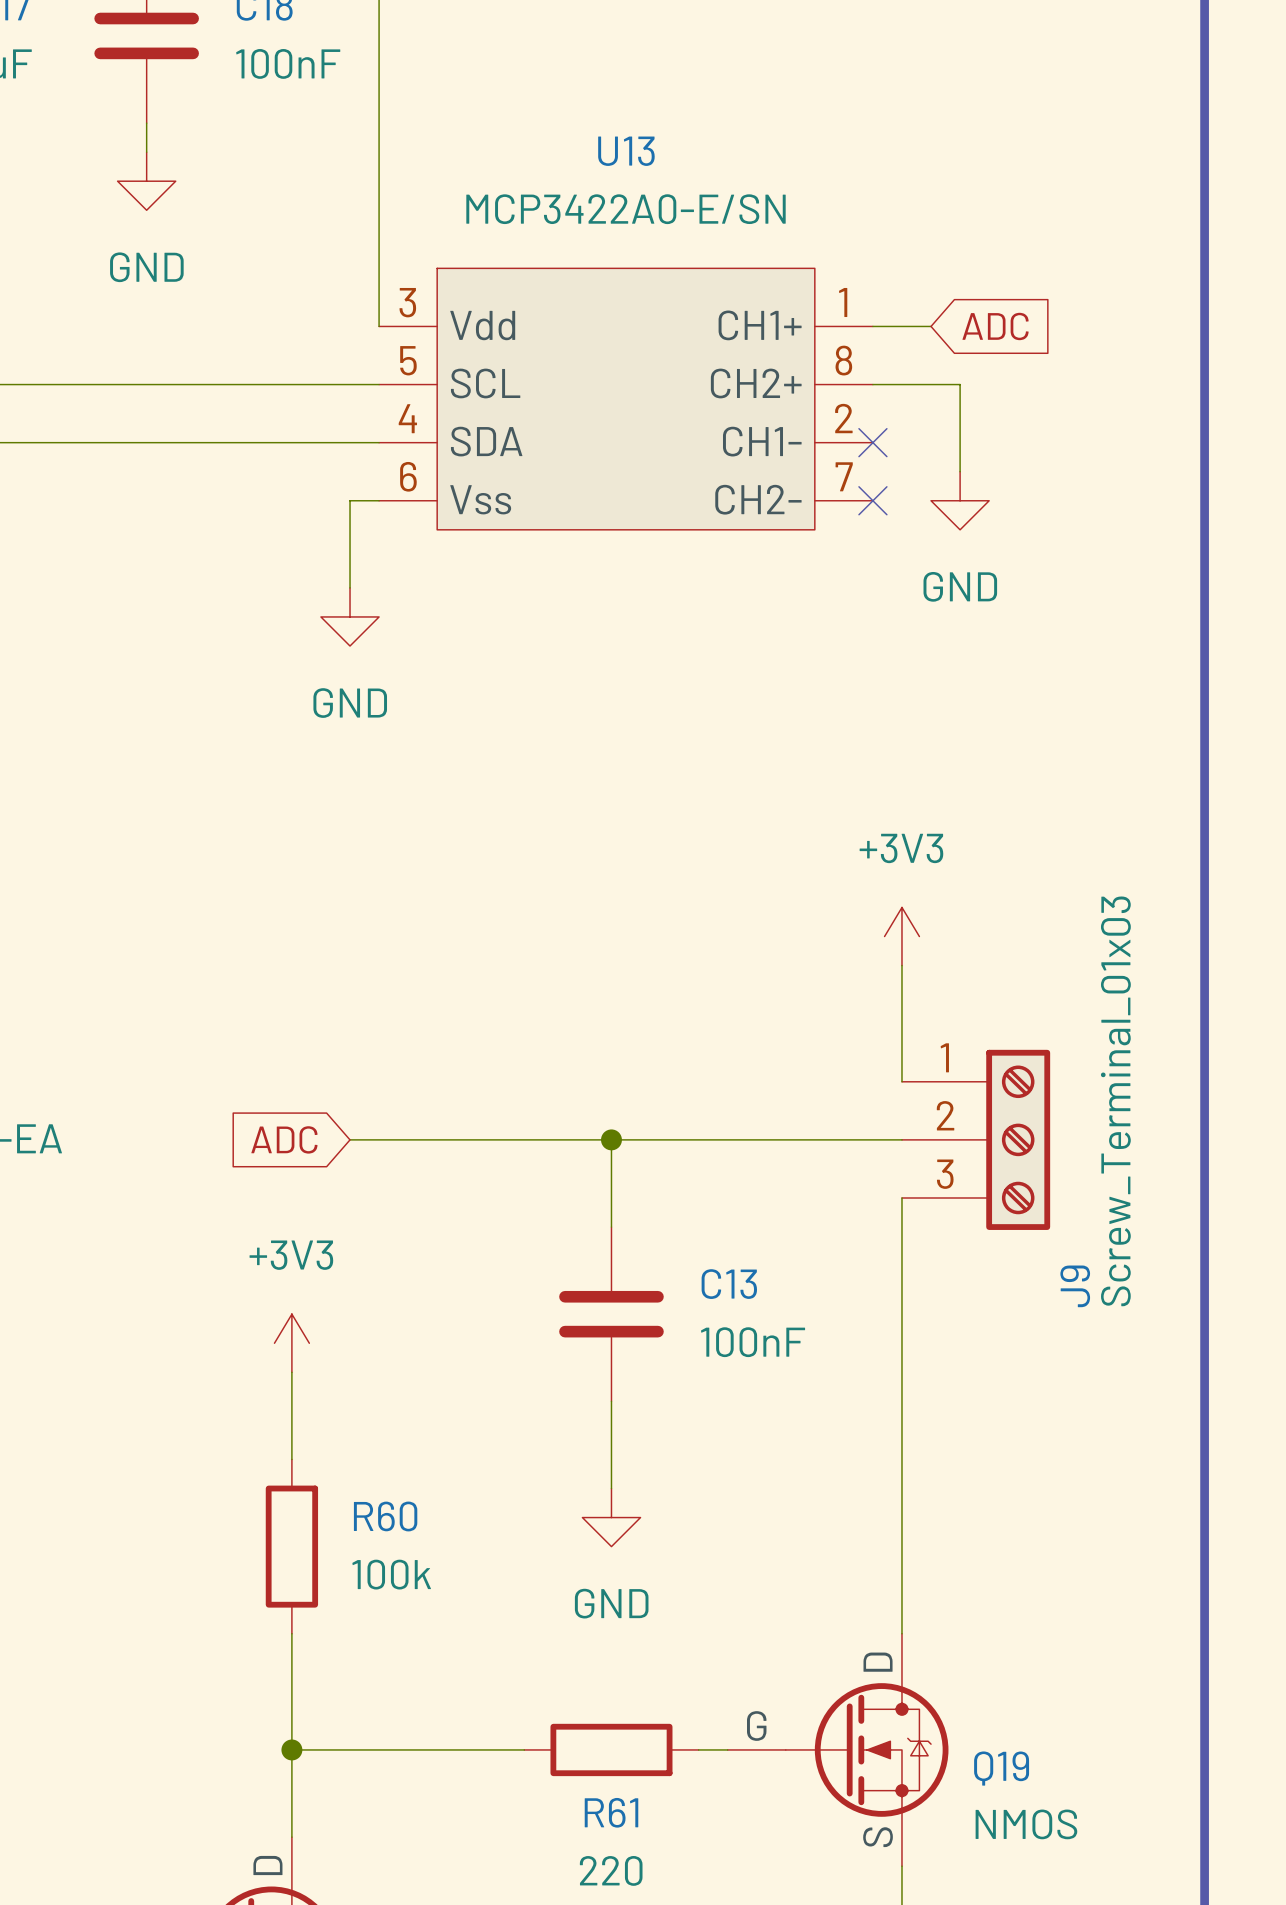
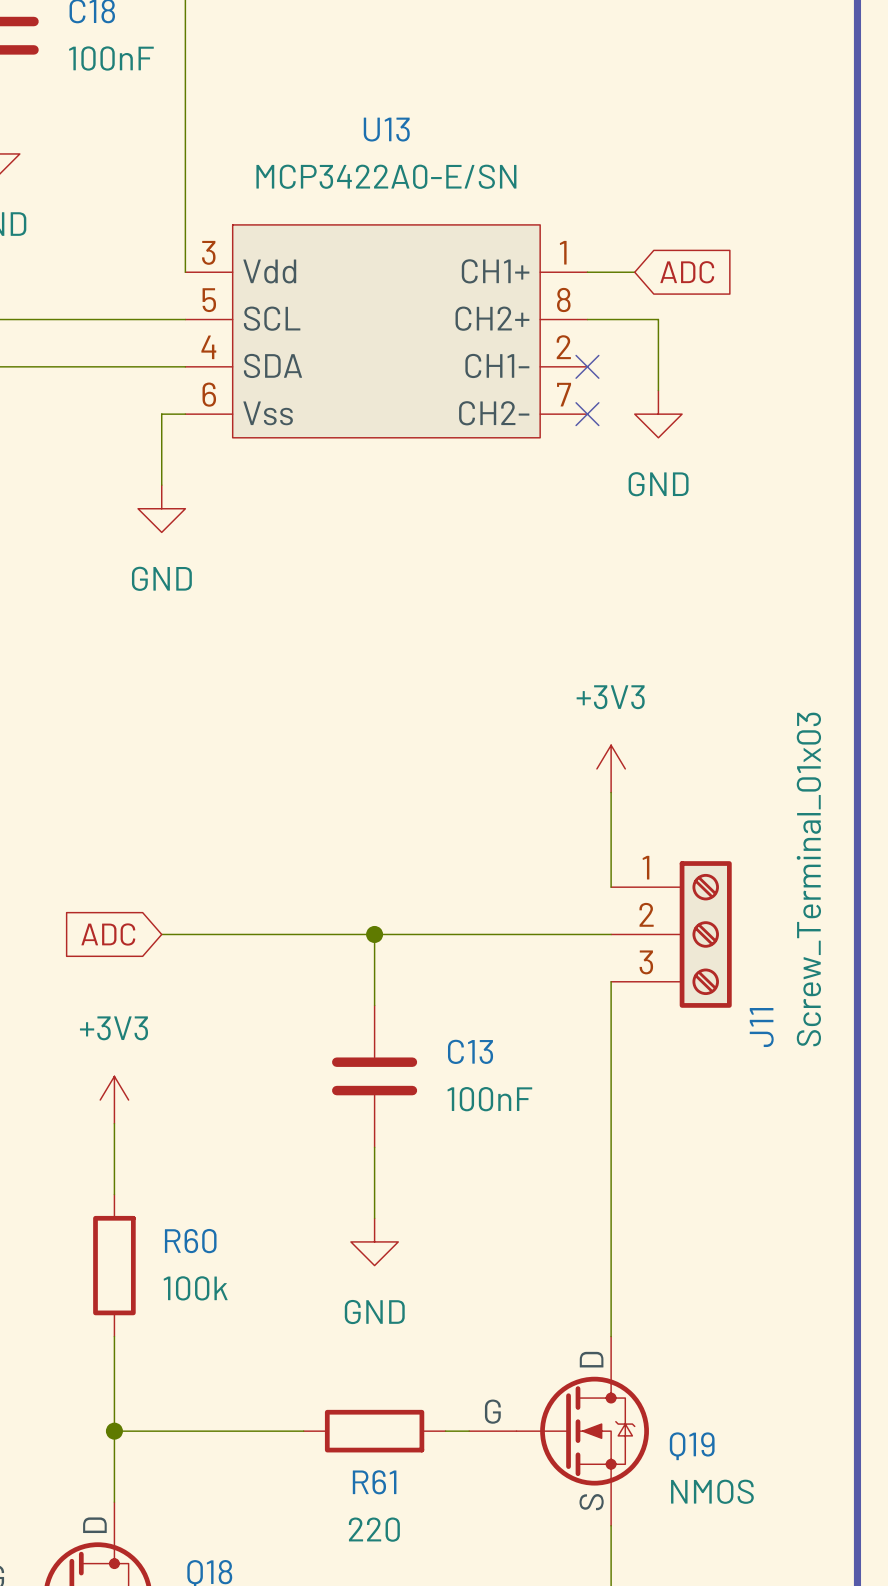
J9 value position: Screw_Terminal_01x03 (1115, 1101) -> Screw_Terminal_01x03 (808, 879)
J9 name: J9 (1075, 1286) -> J11 (761, 1027)

